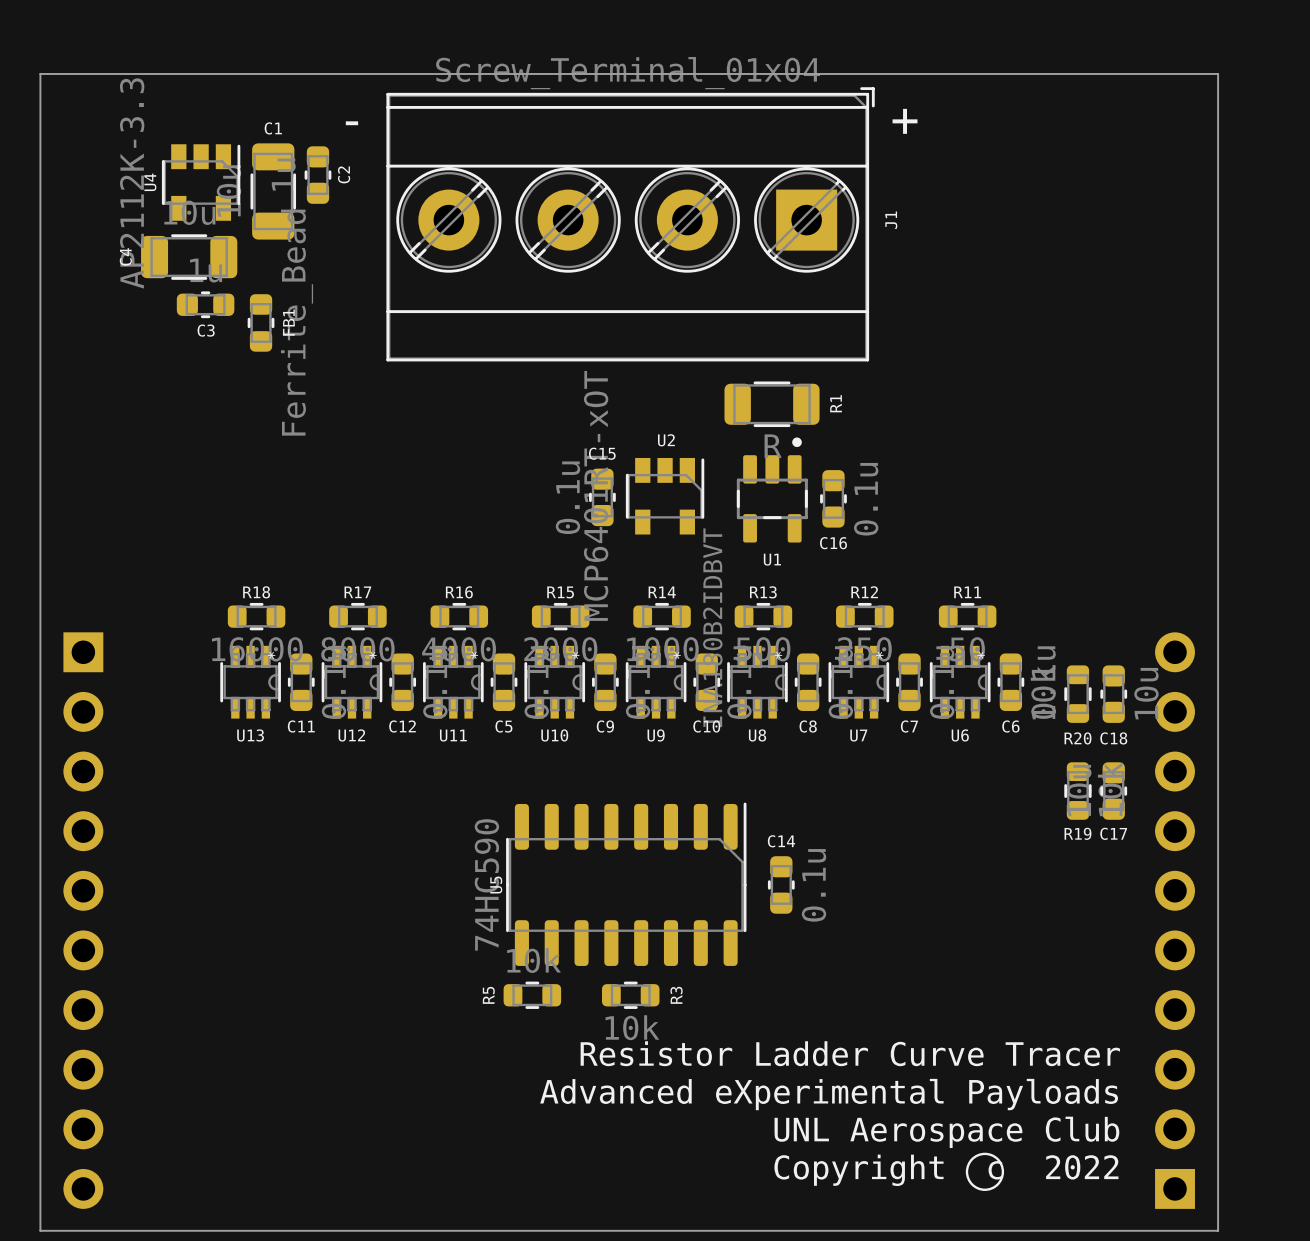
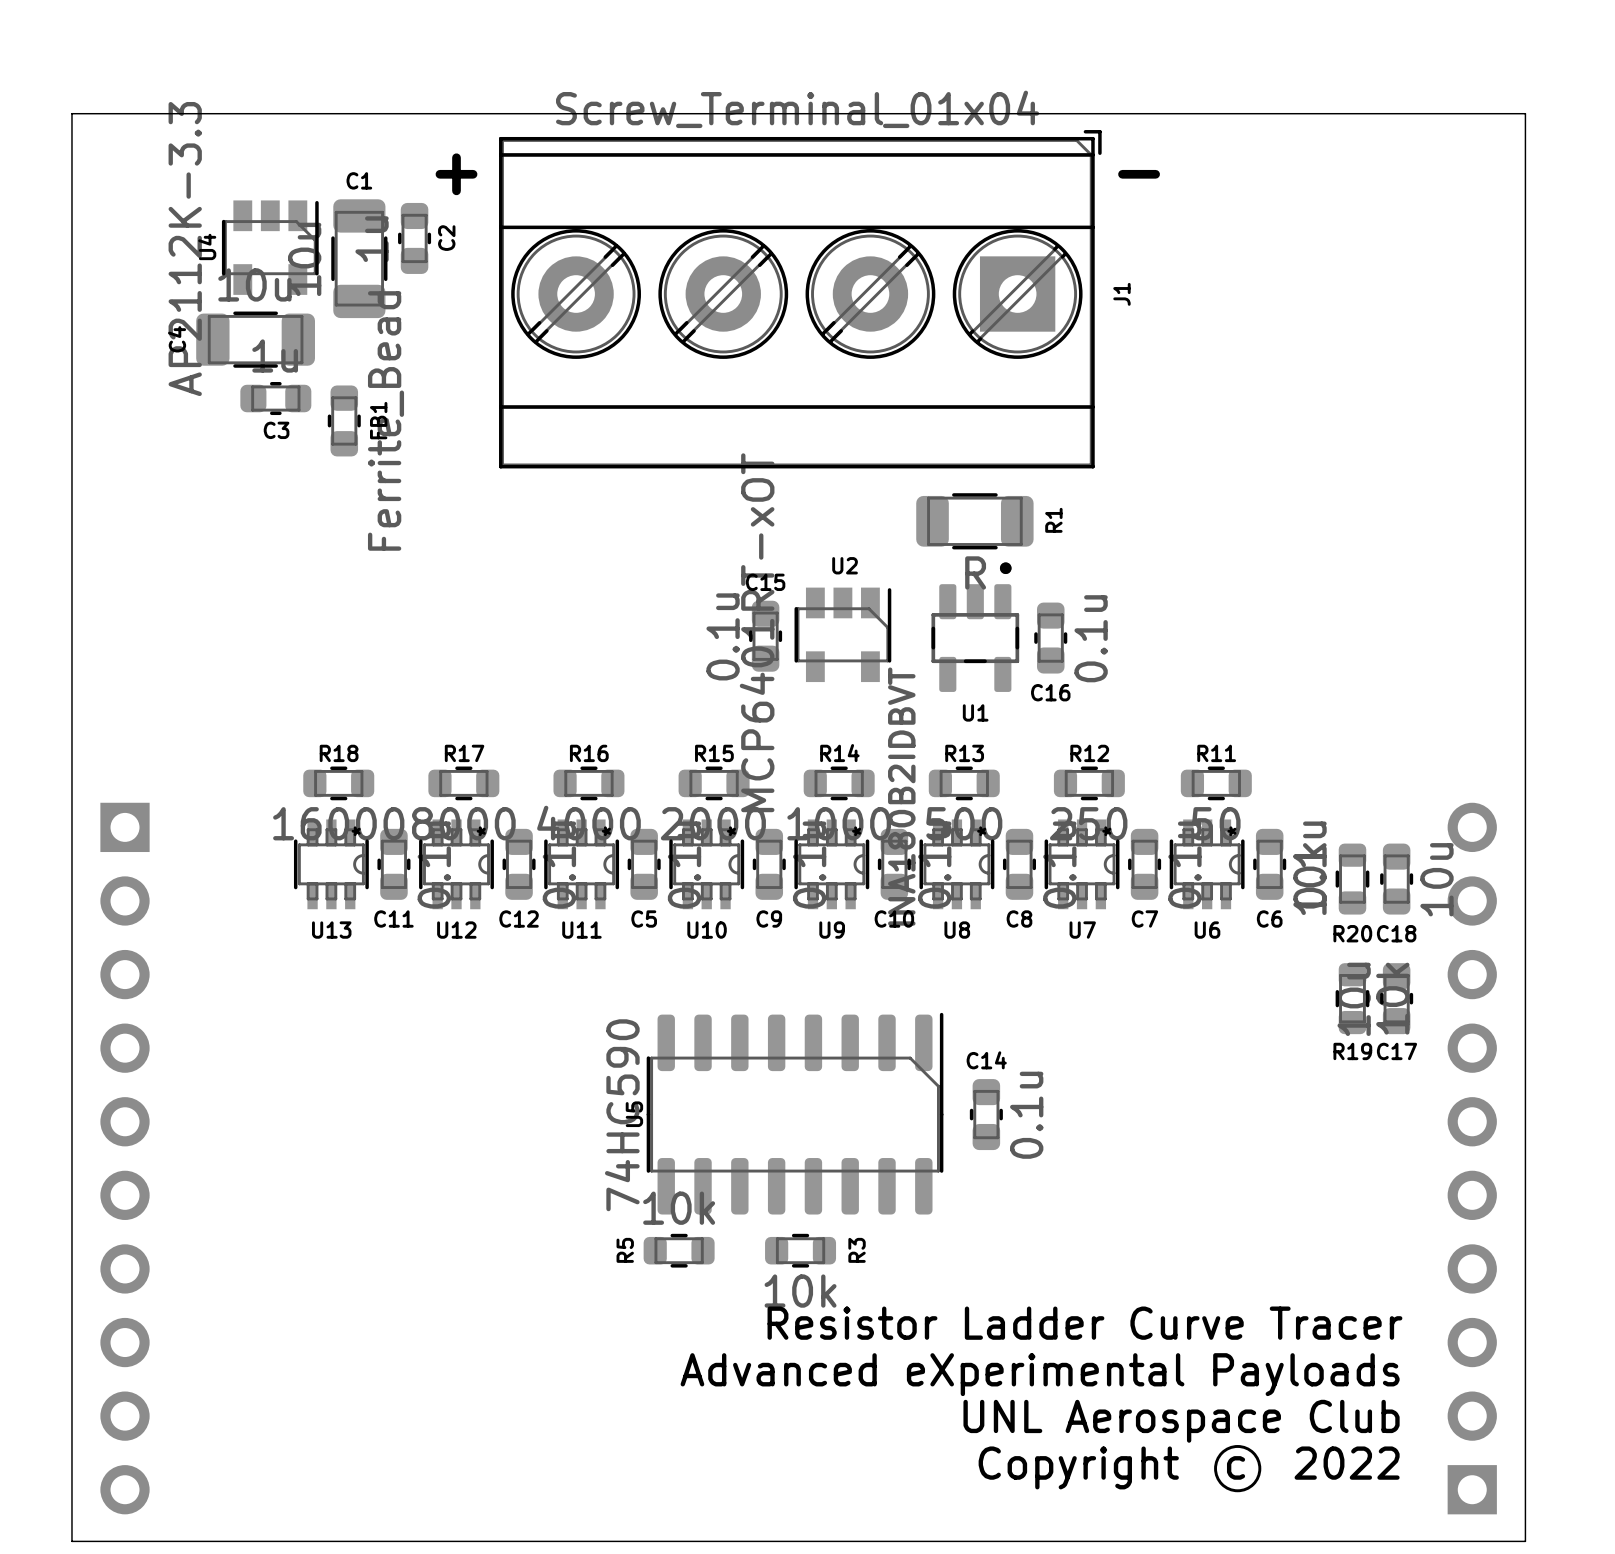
text: + (905, 121) -> - (1139, 174)
text: - (351, 123) -> + (456, 174)

